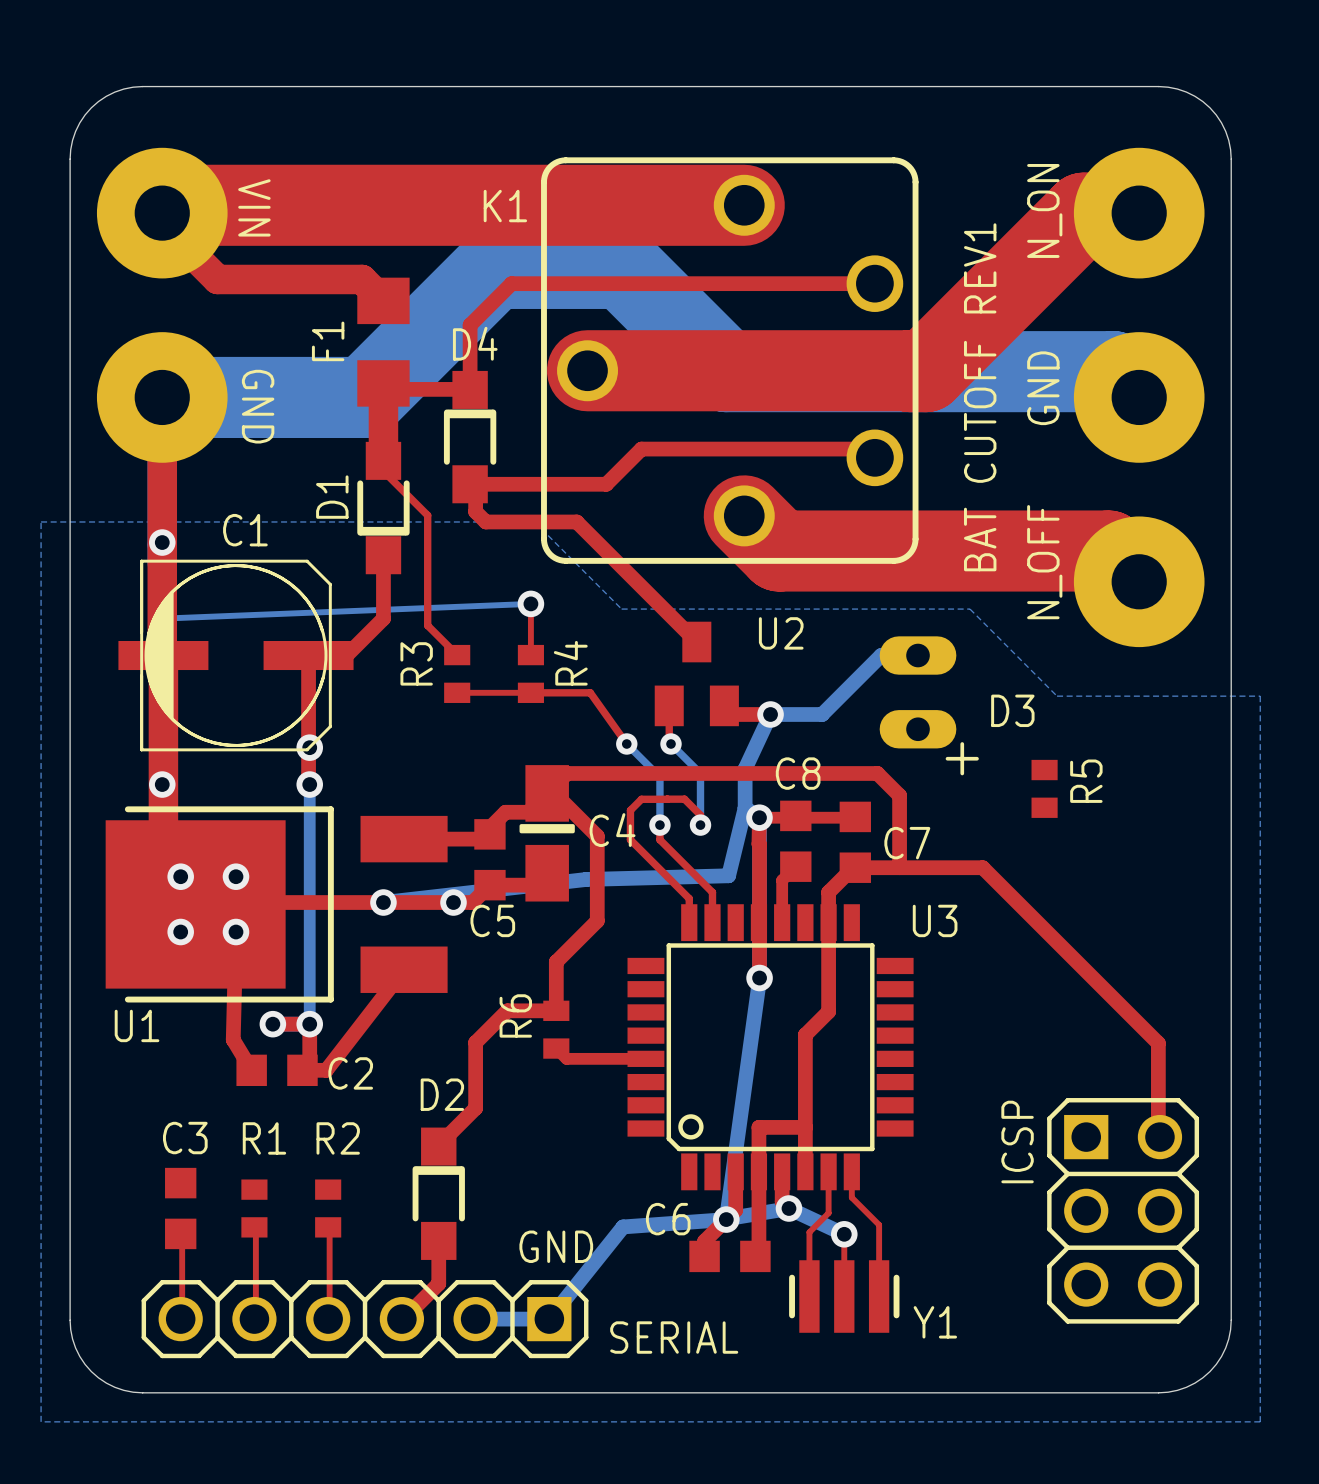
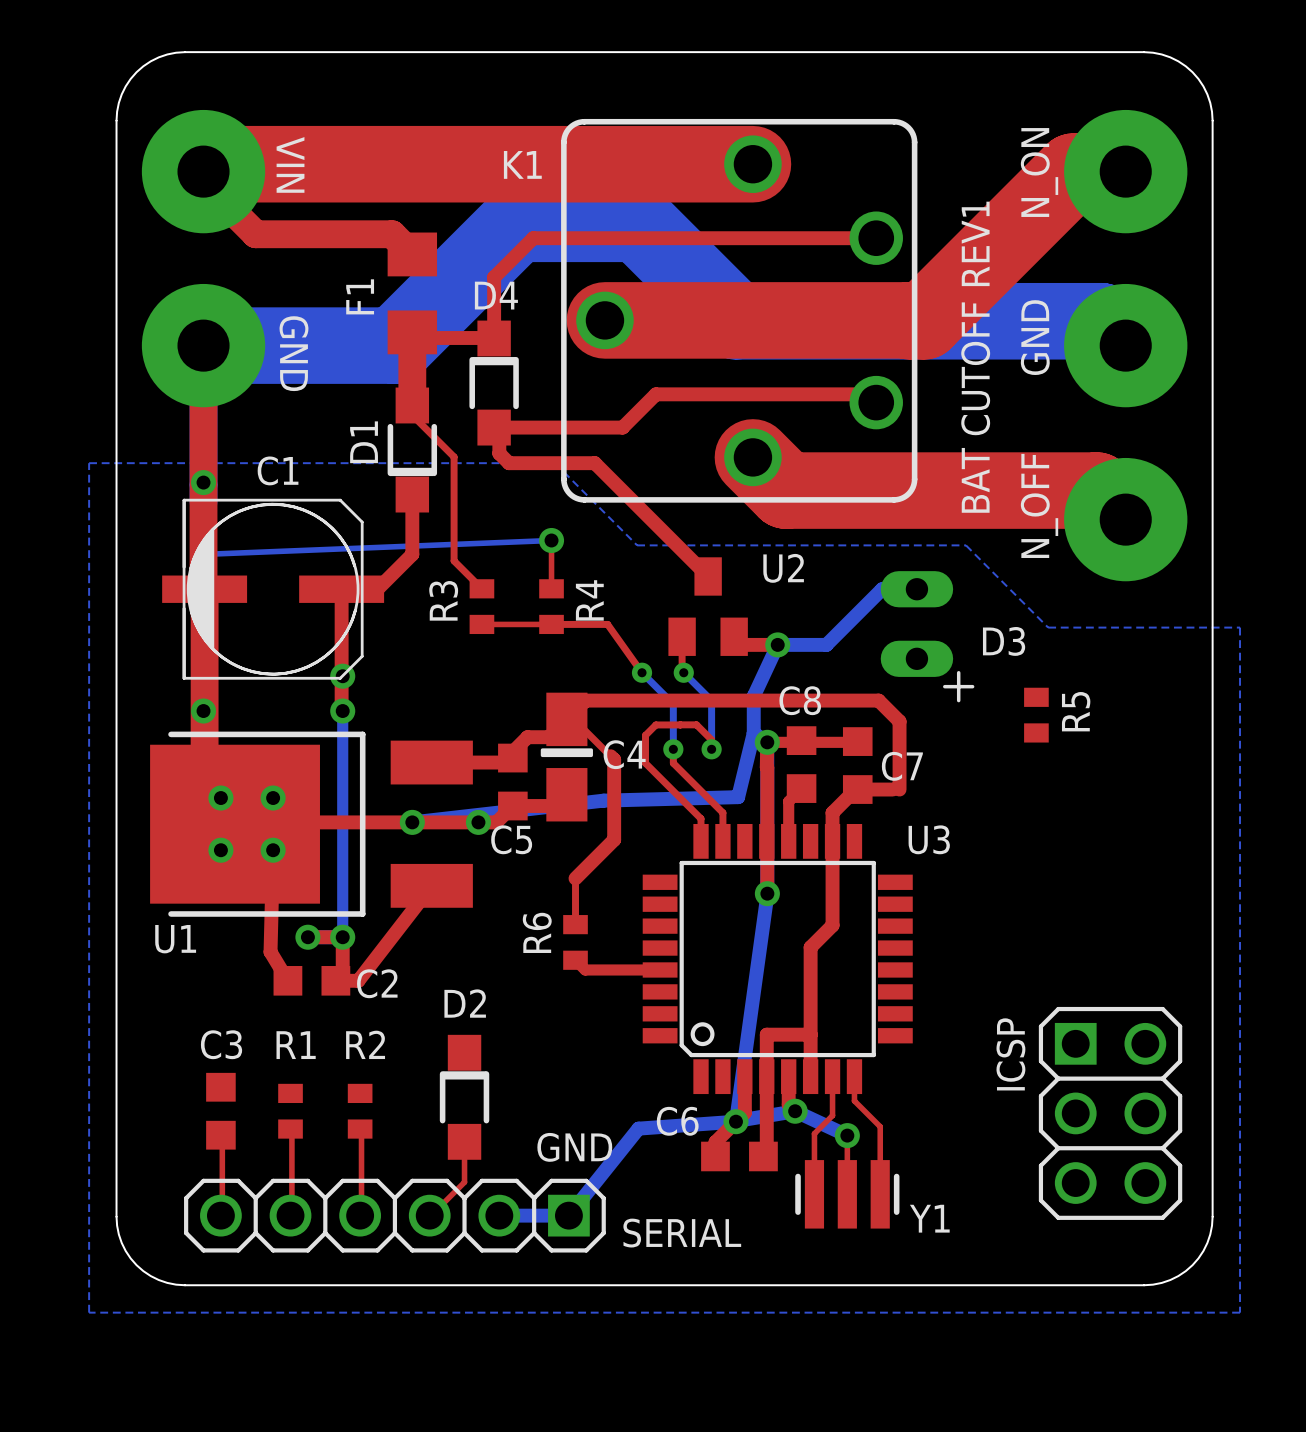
top track width: thick (564, 802) (593, 832) -> thin (582, 728) (610, 756)
top track: (892, 867) (982, 867) (1158, 1043) (1158, 1139) -> none
top track width: thick (556, 961) (556, 1010) -> thin (575, 878) (575, 924)
top track: (556, 1010) (507, 1010) (475, 1042) (475, 1108) (438, 1145) -> none
top track width: thick (438, 1240) (438, 1283) (403, 1319) -> thin (464, 1141) (464, 1182) (431, 1215)

